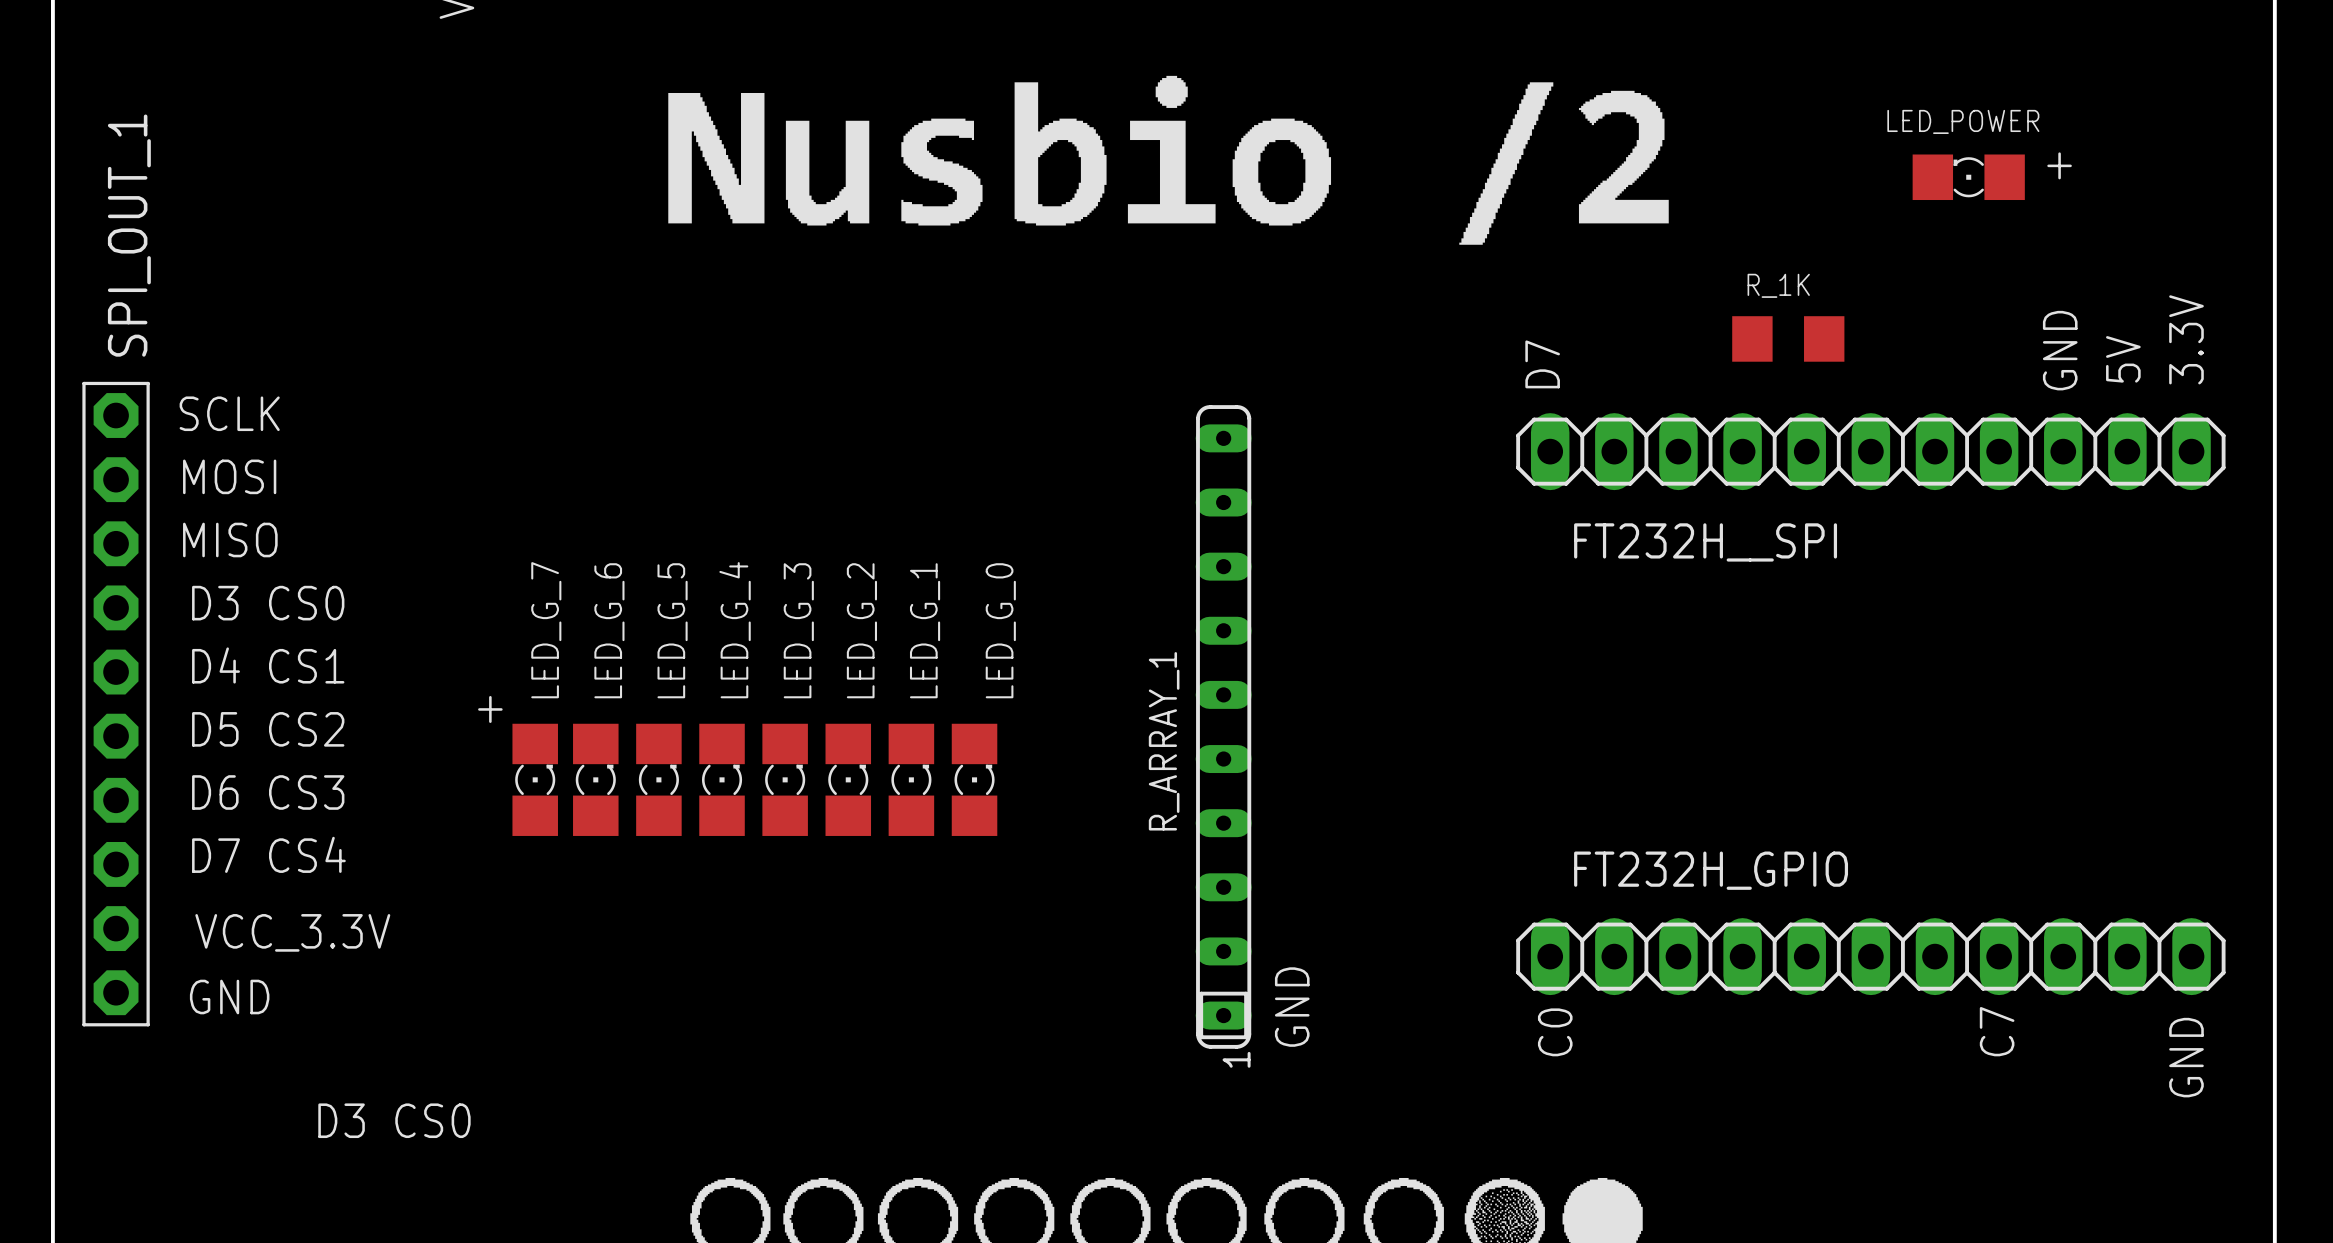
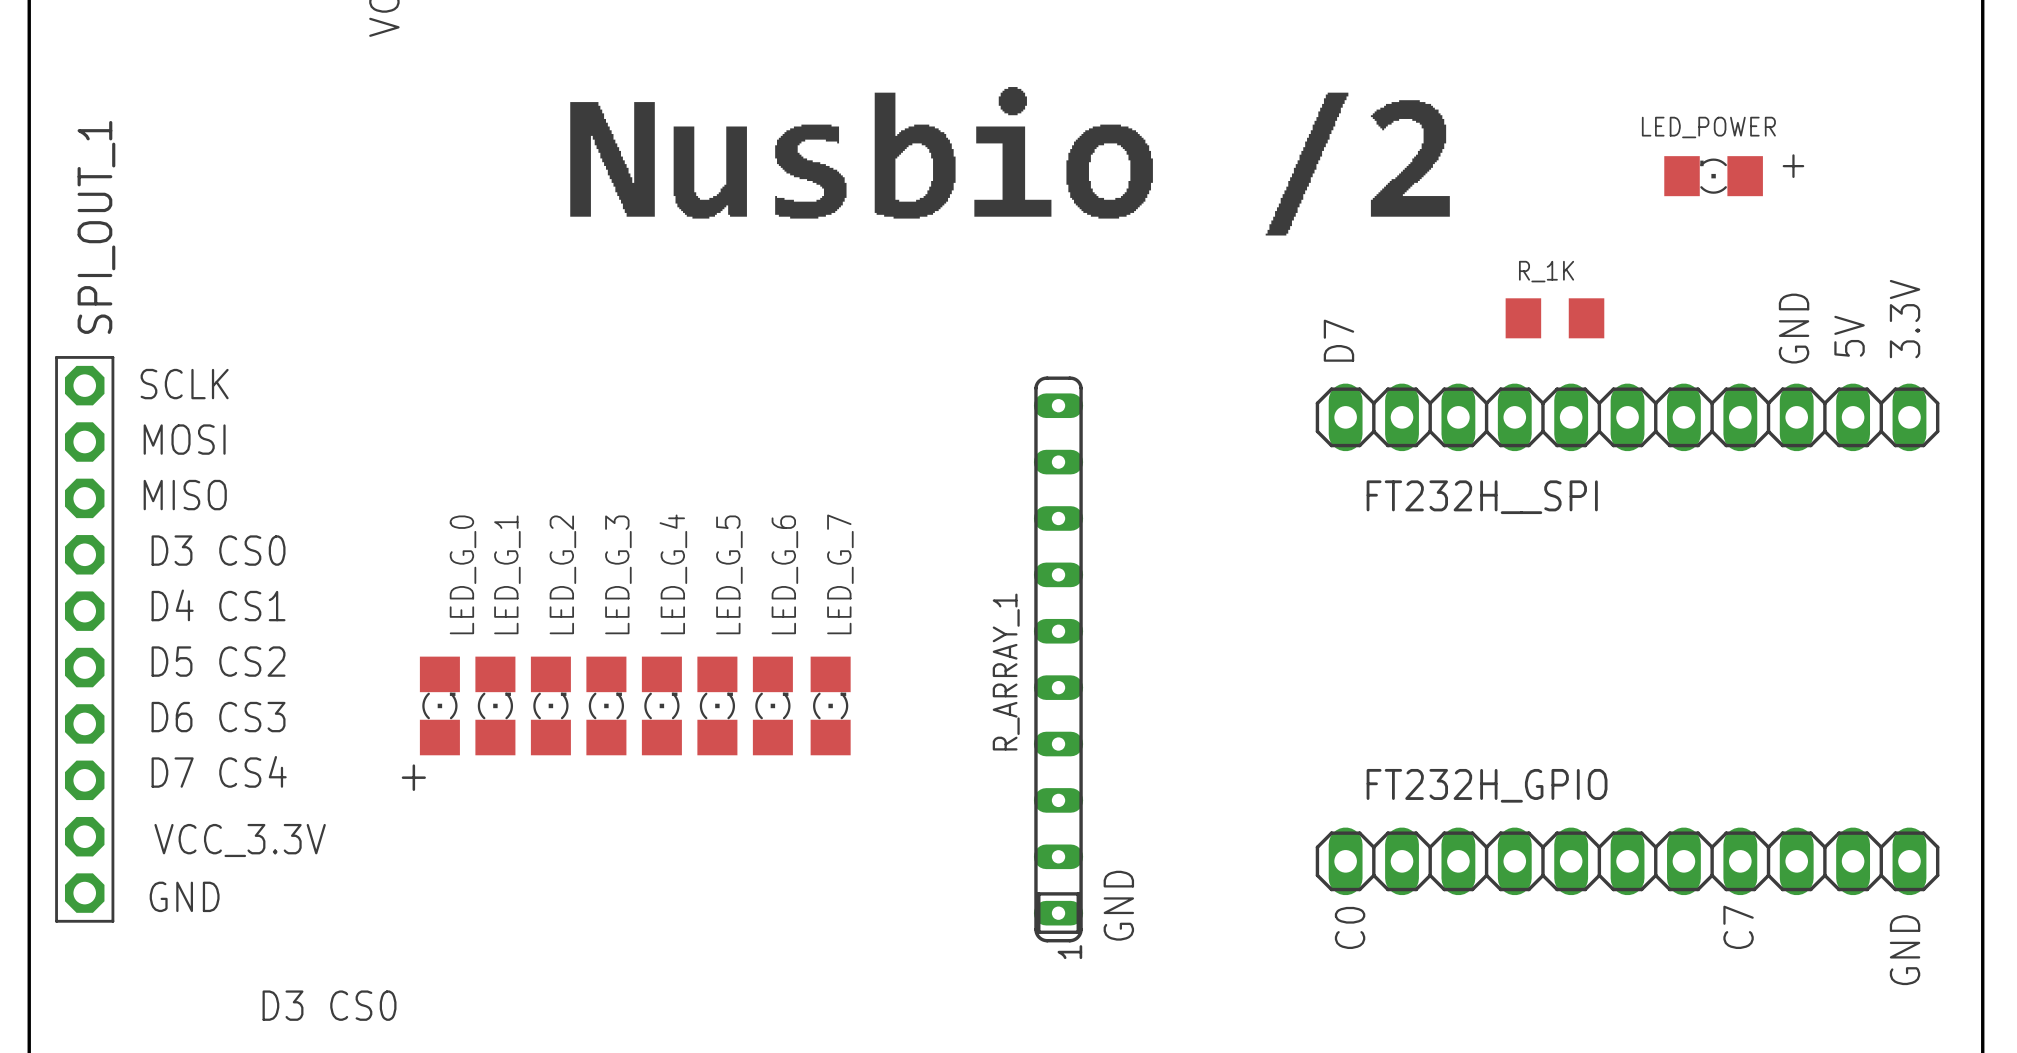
text position: + (490, 709) -> + (413, 777)
LED_G_7 position: (535, 779) -> (830, 705)
LED_G_6 position: (595, 779) -> (772, 705)
LED_G_5 position: (658, 779) -> (717, 705)
LED_G_4 position: (722, 779) -> (661, 705)
LED_G_3 position: (785, 779) -> (606, 705)
LED_G_2 position: (848, 779) -> (550, 705)
LED_G_1 position: (911, 779) -> (495, 705)
LED_G_0 position: (974, 779) -> (439, 705)

